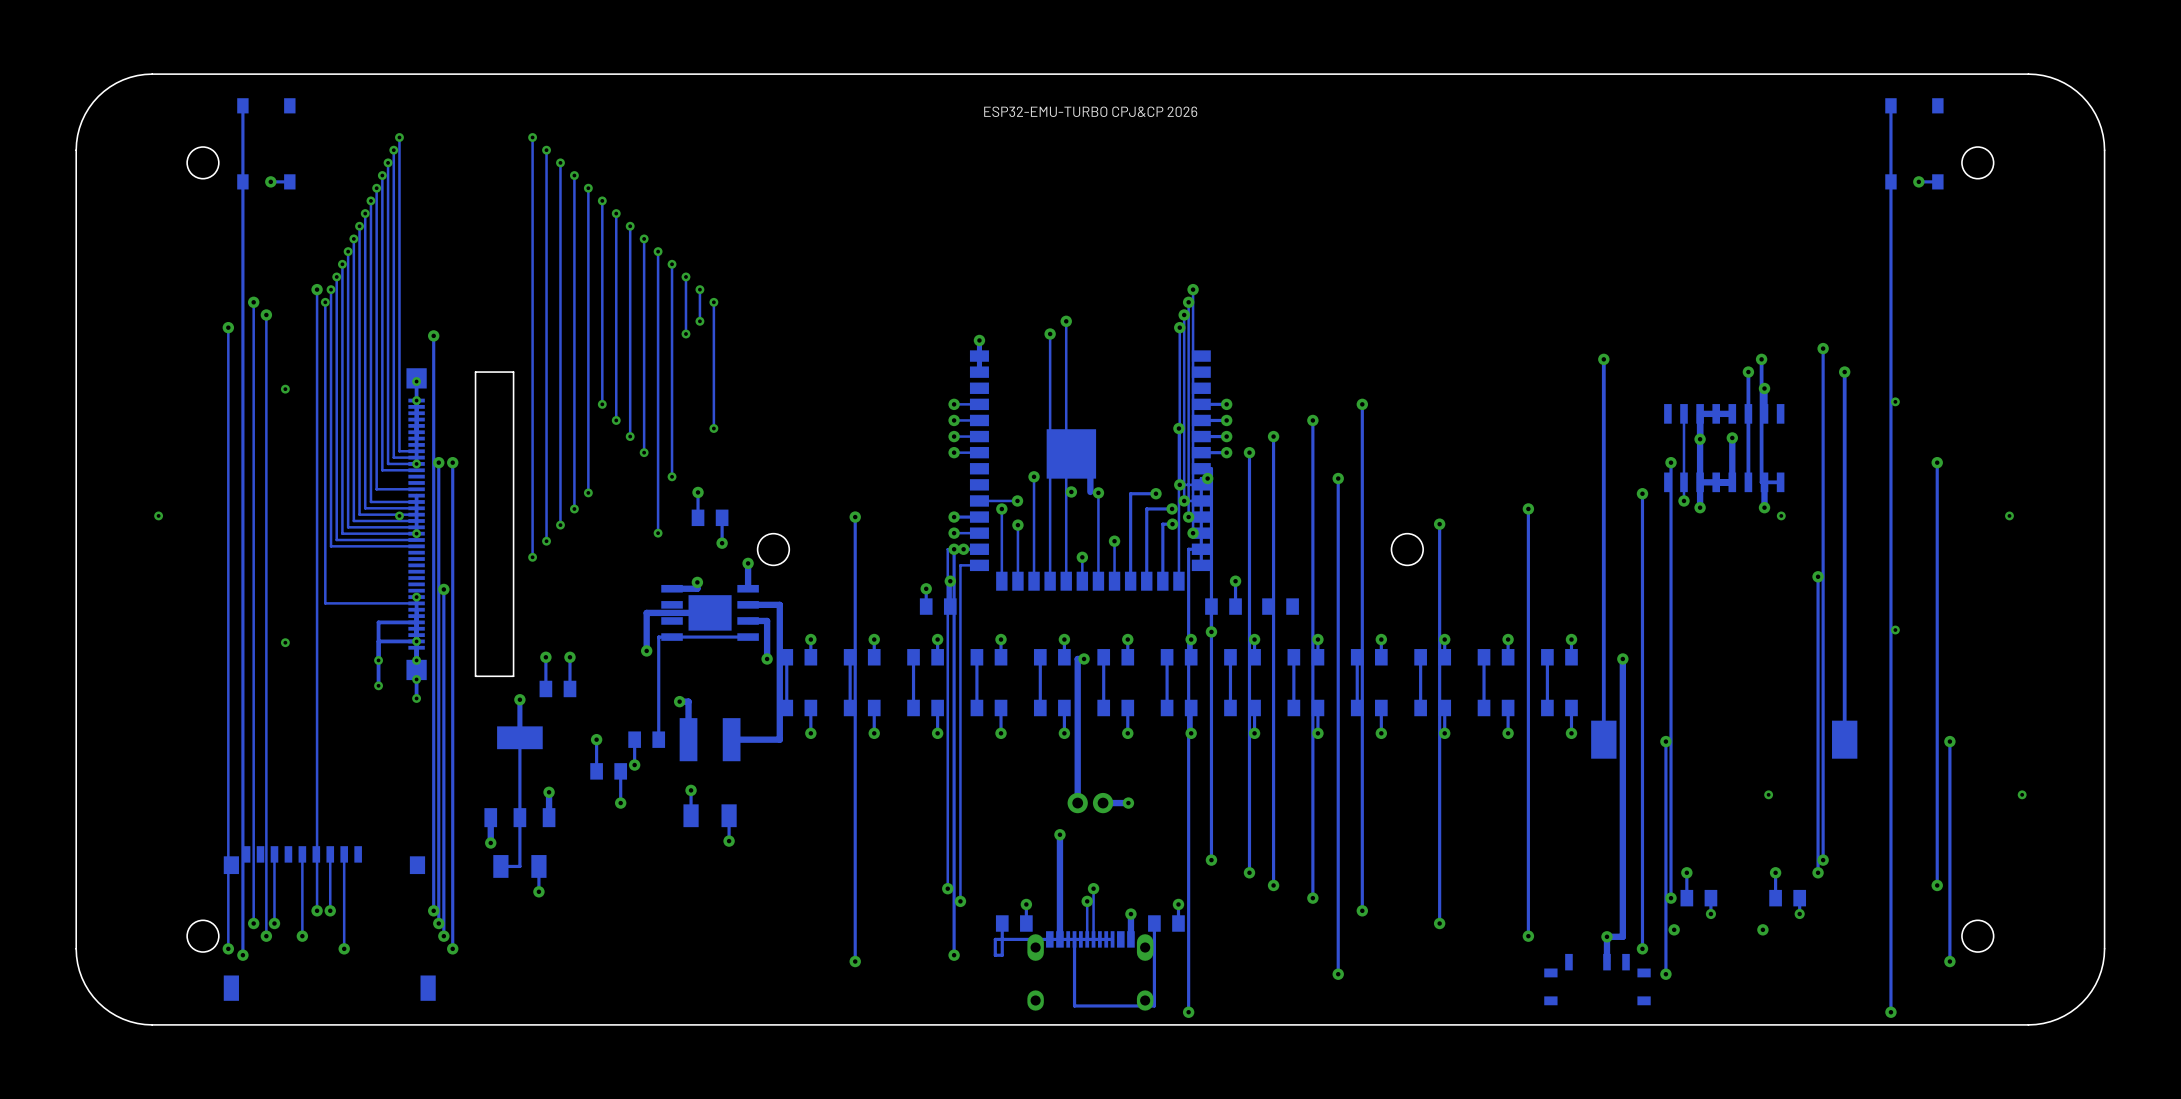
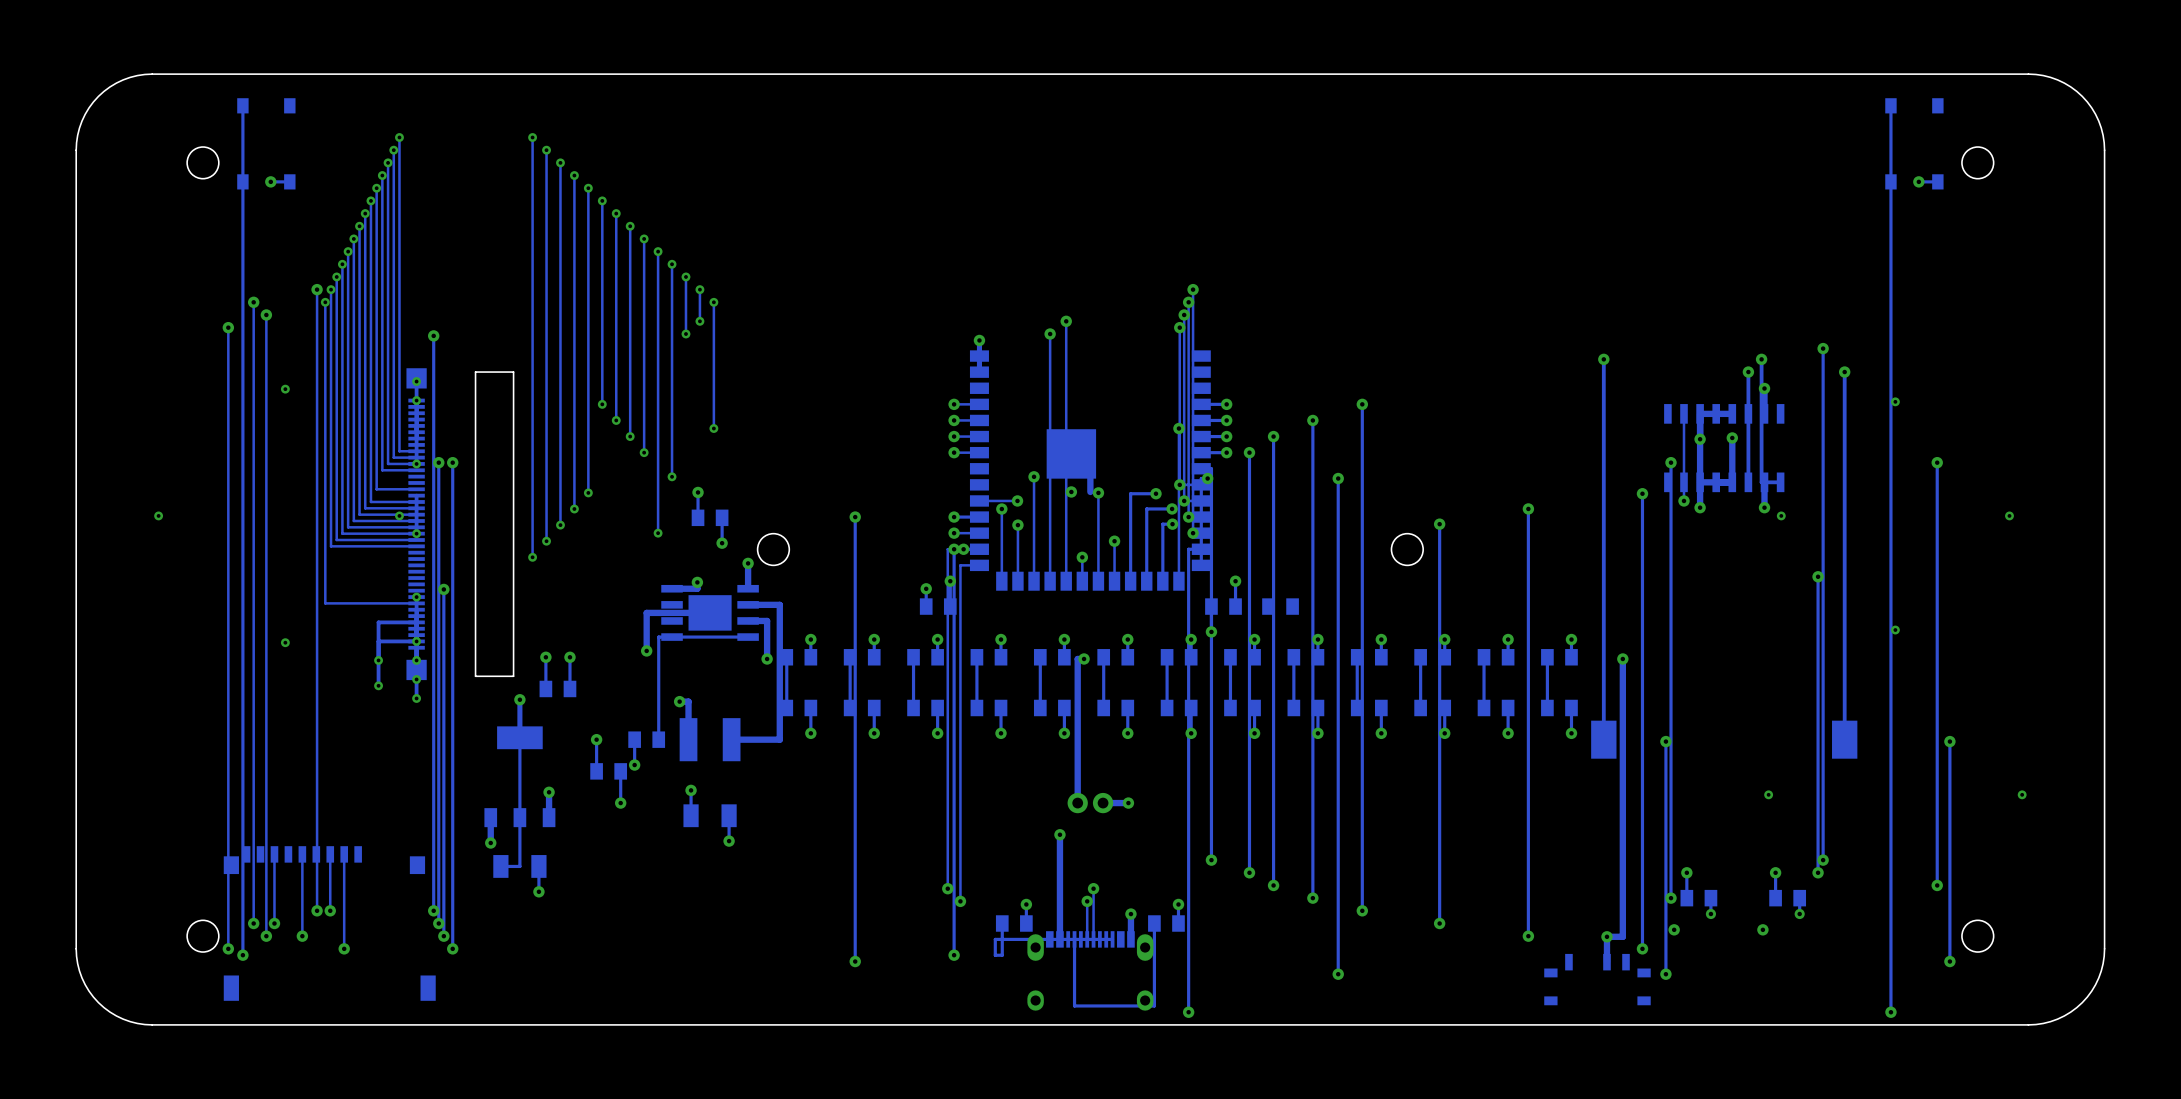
text: ESP32-EMU-TURBO CPJ&CP 2026 (1090, 111) -> none

